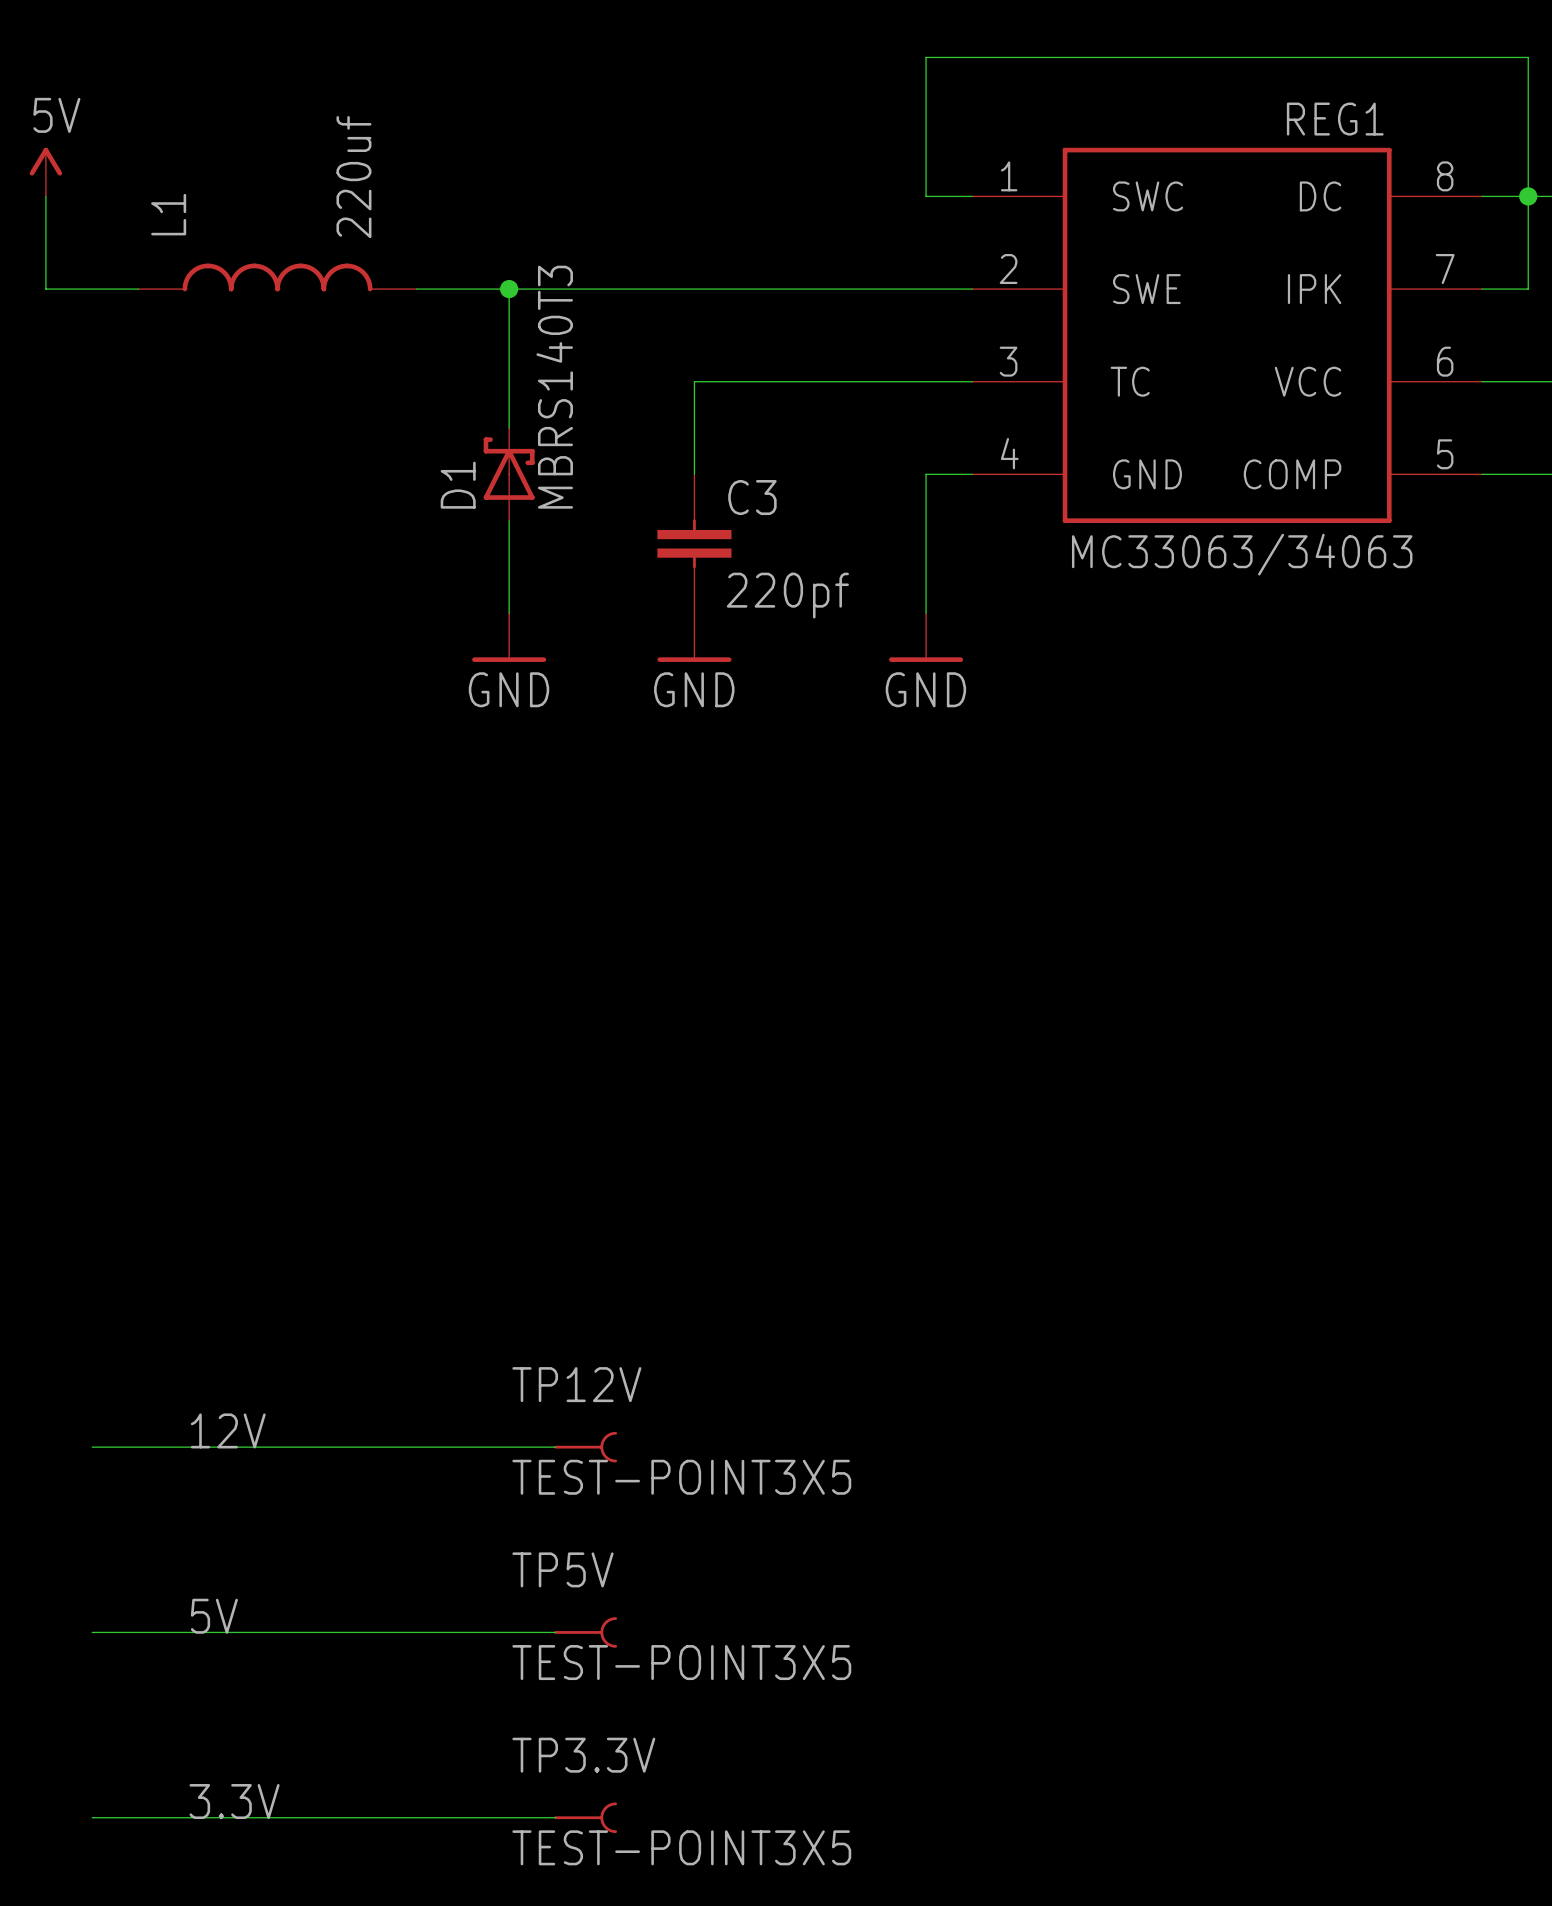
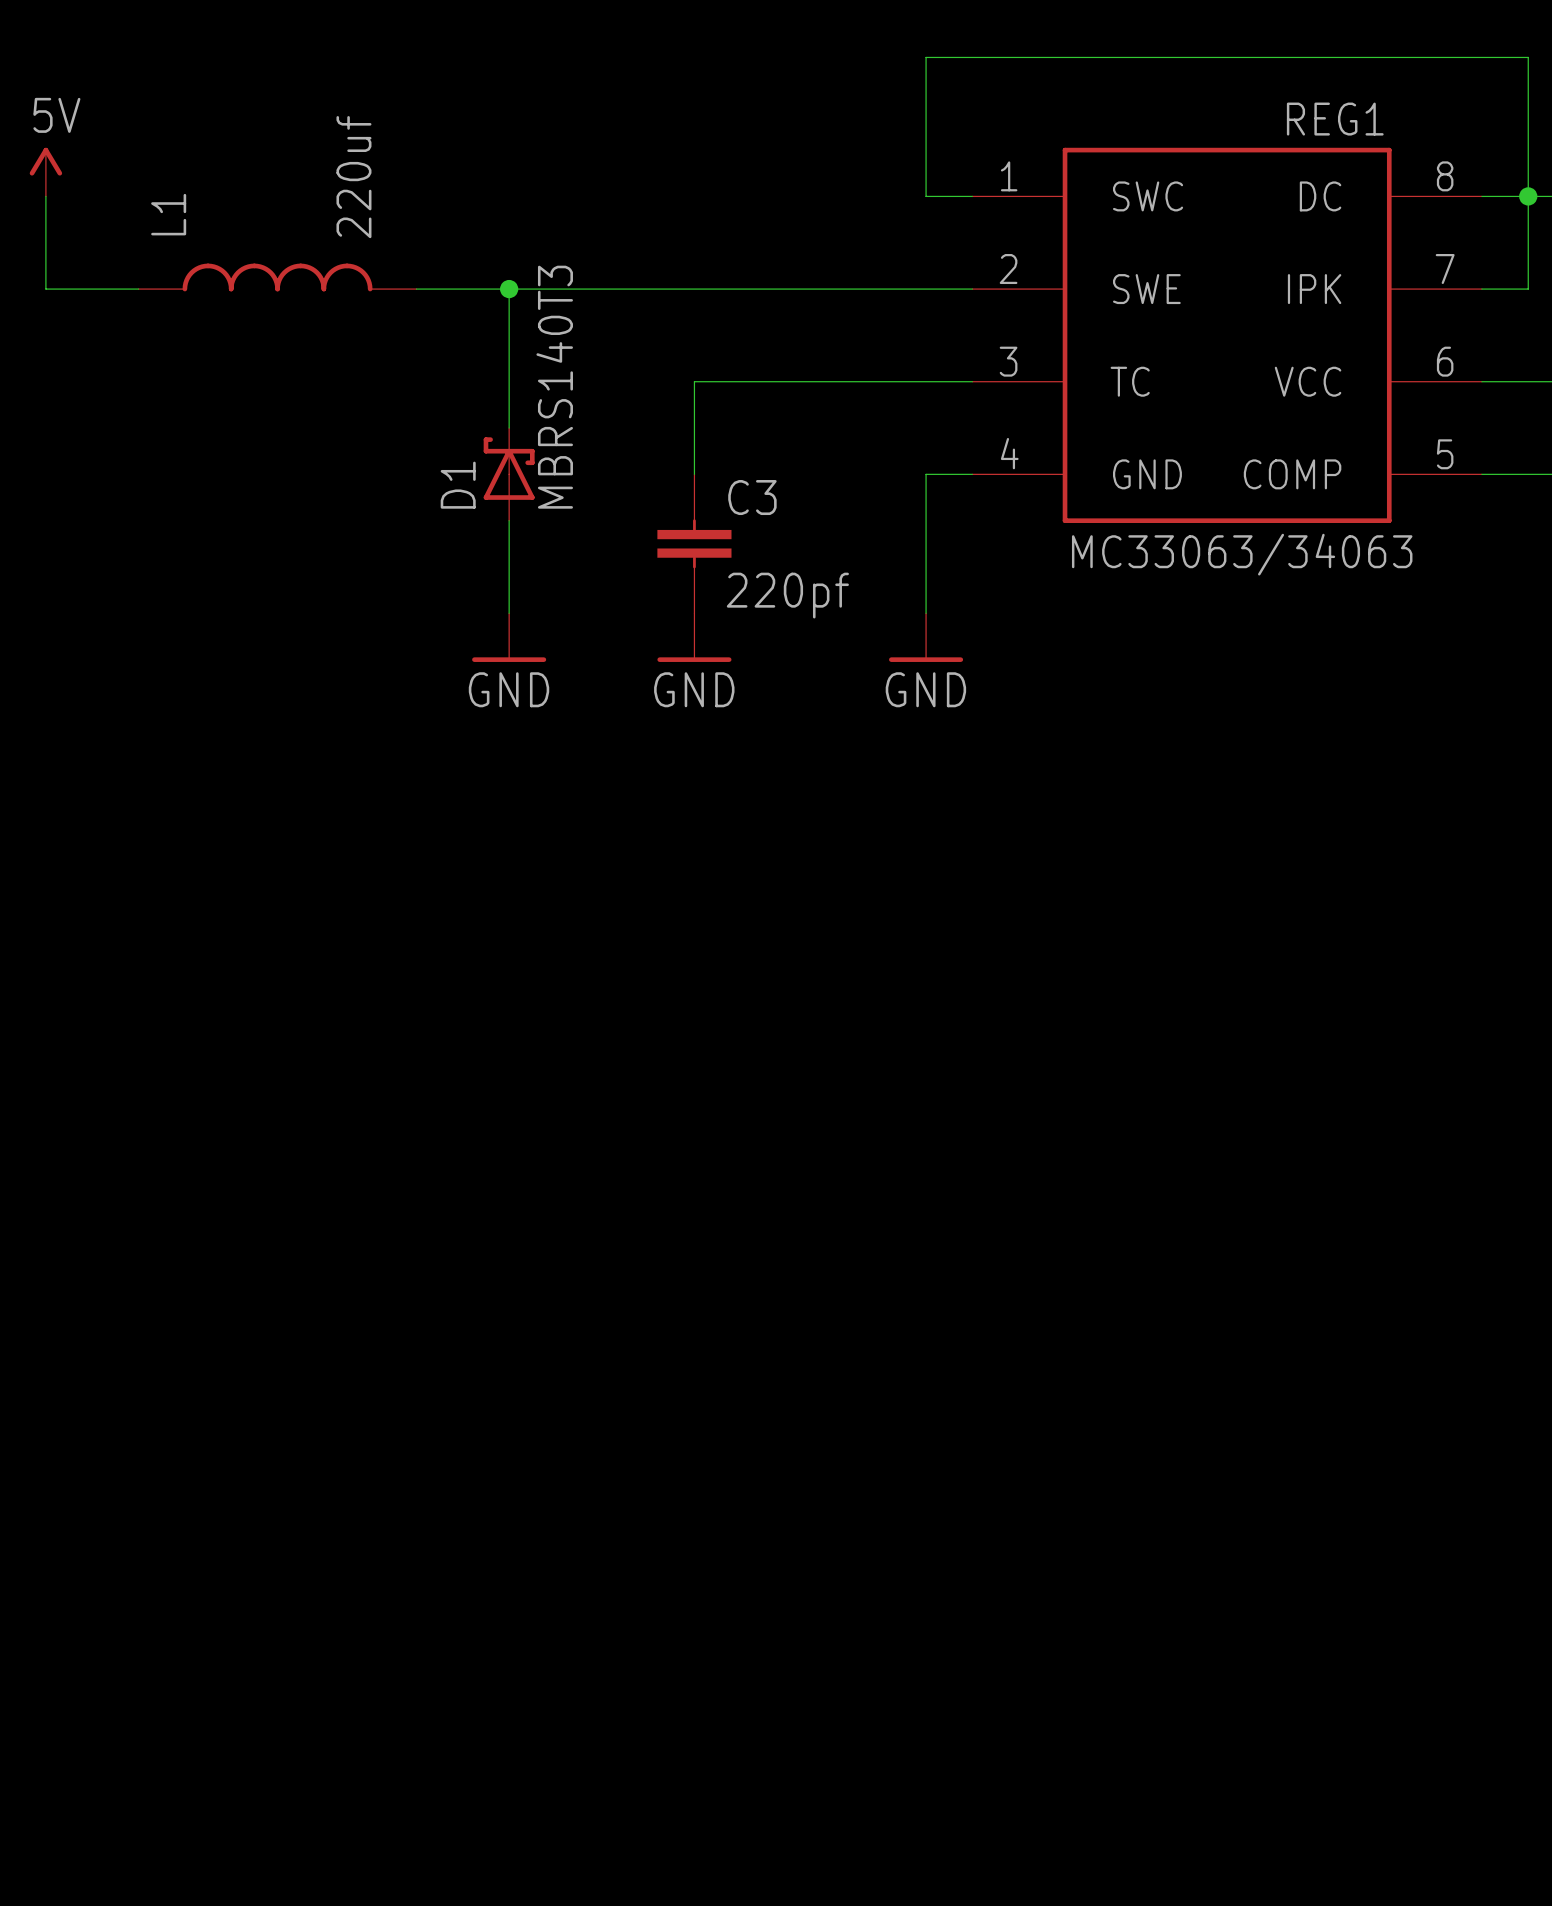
label: 12V (228, 1430) -> none
wire: (92, 1447) (555, 1447) -> none
TP12V: TEST-POINT3X5 (585, 1447) -> none
label: 5V (214, 1616) -> none
wire: (92, 1632) (555, 1632) -> none
TP5V: TEST-POINT3X5 (585, 1632) -> none
label: 3.3V (234, 1801) -> none
wire: (92, 1817) (555, 1817) -> none
TP3.3V: TEST-POINT3X5 (585, 1817) -> none

